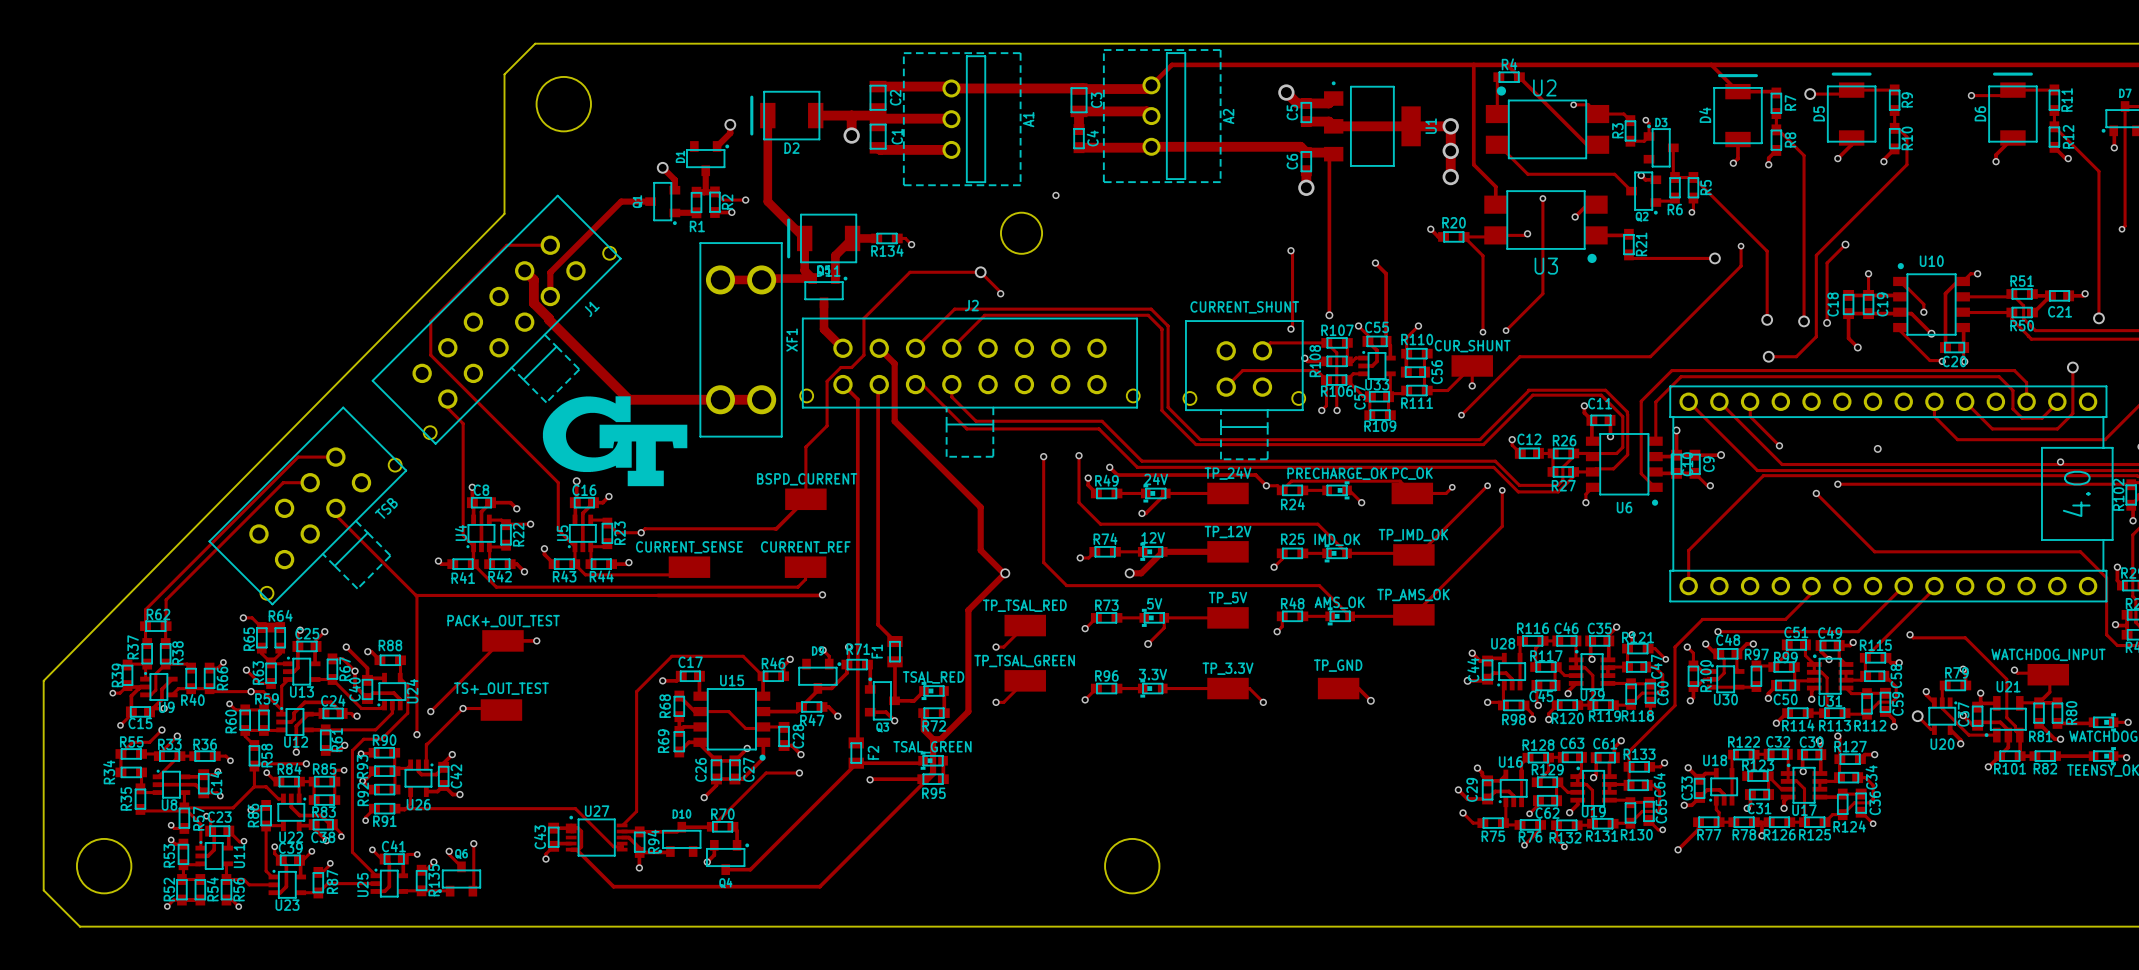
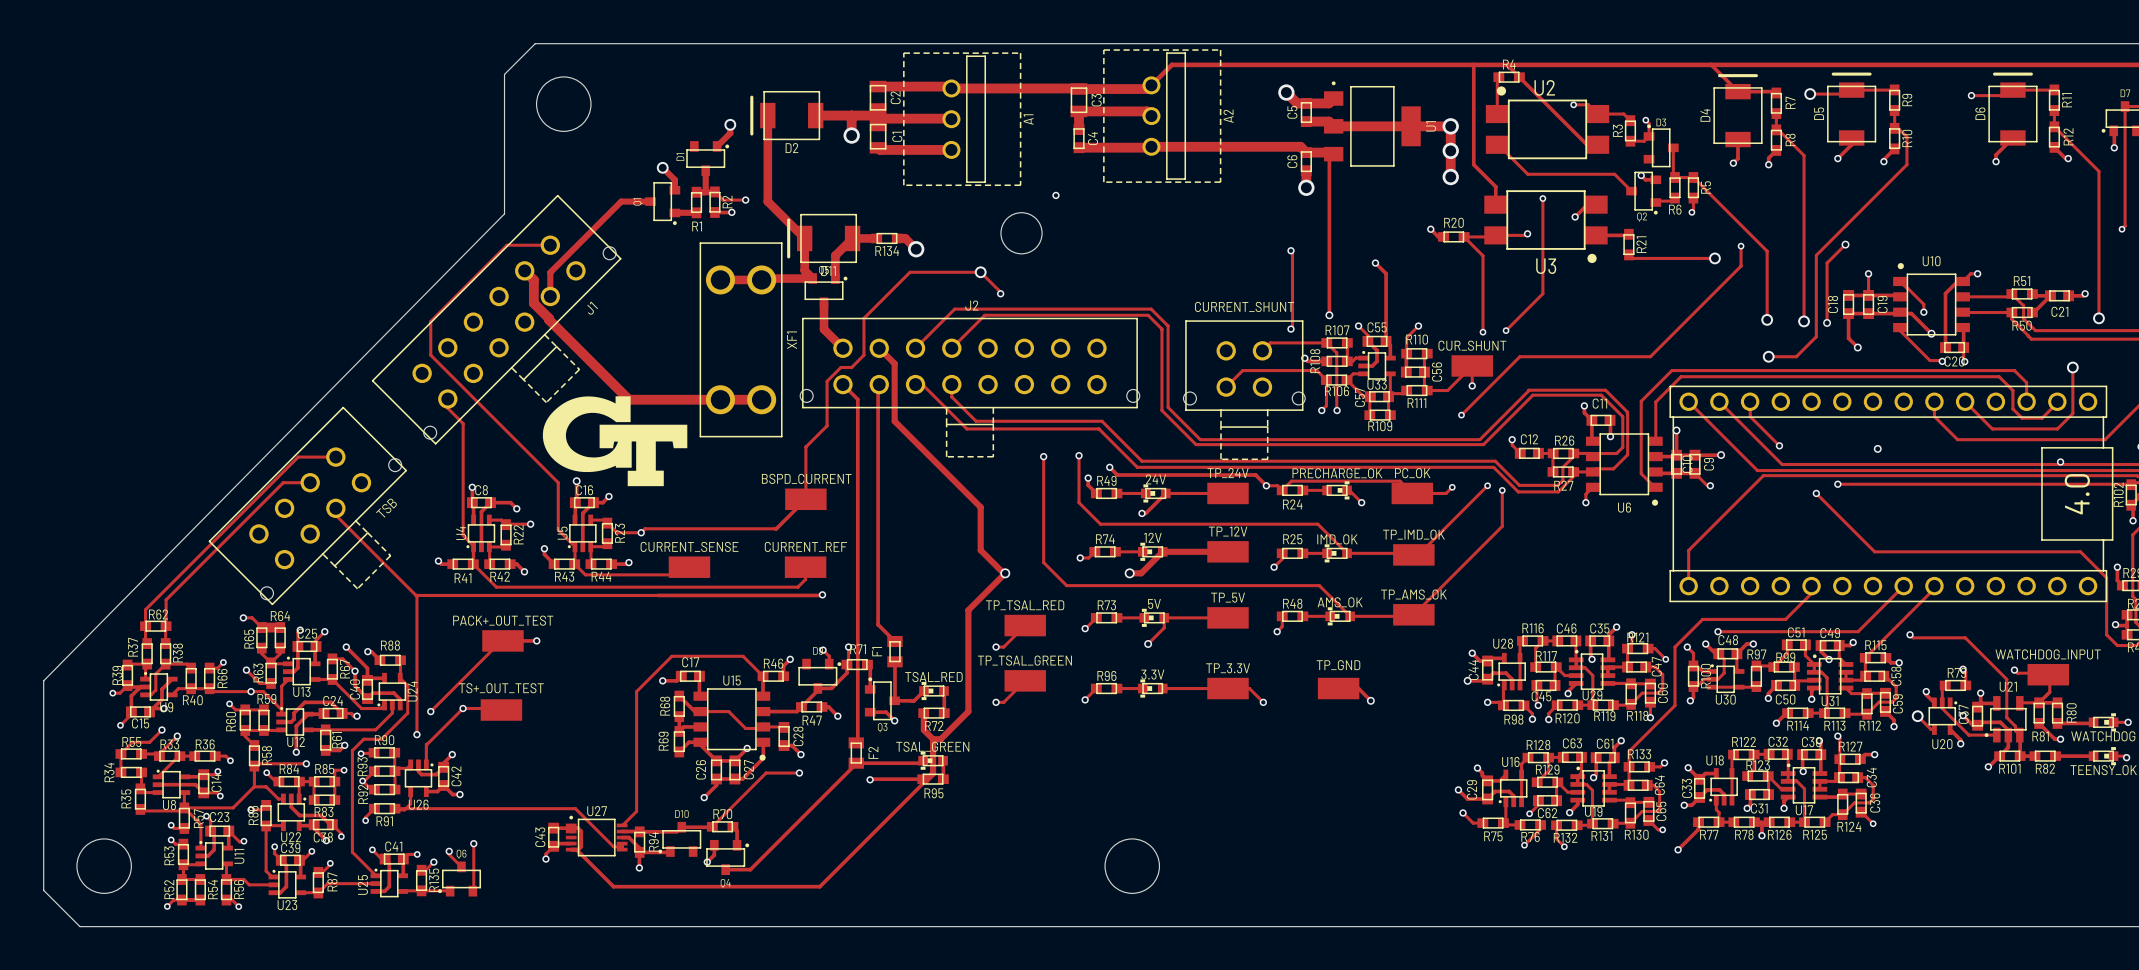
track width: thin (897, 238) (905, 238) (911, 244) -> thick (897, 238) (905, 238) (911, 244)
via size: [907, 240, 916, 249] -> [908, 241, 925, 258]

